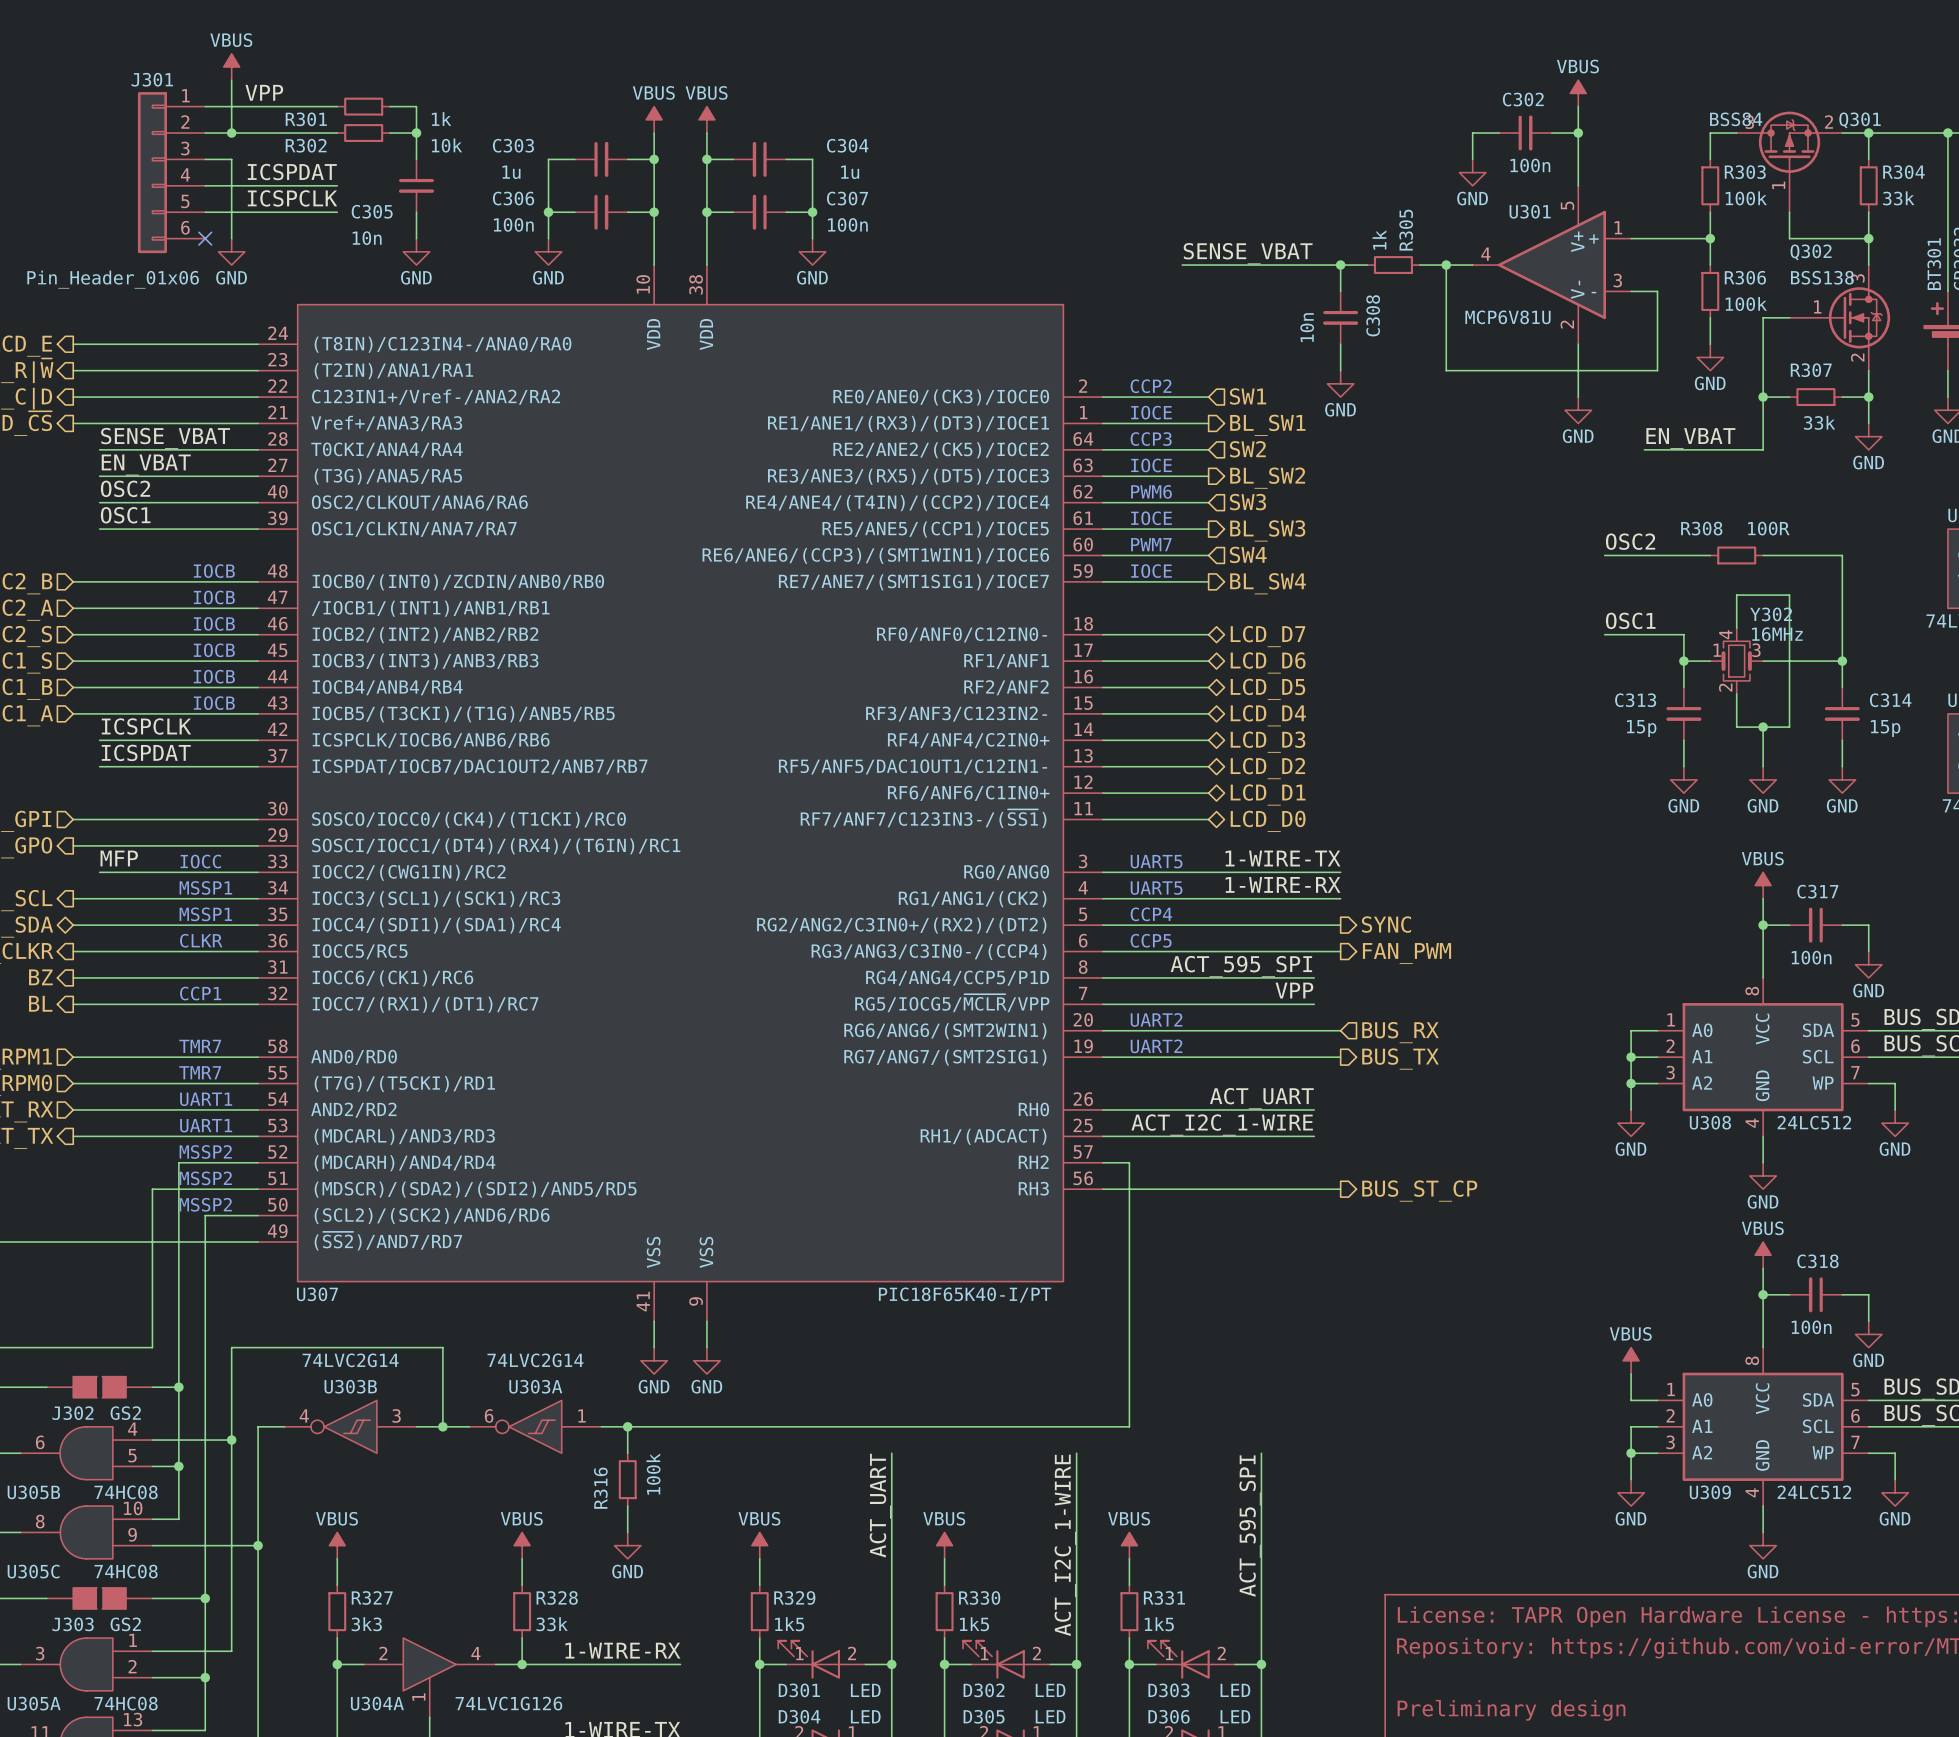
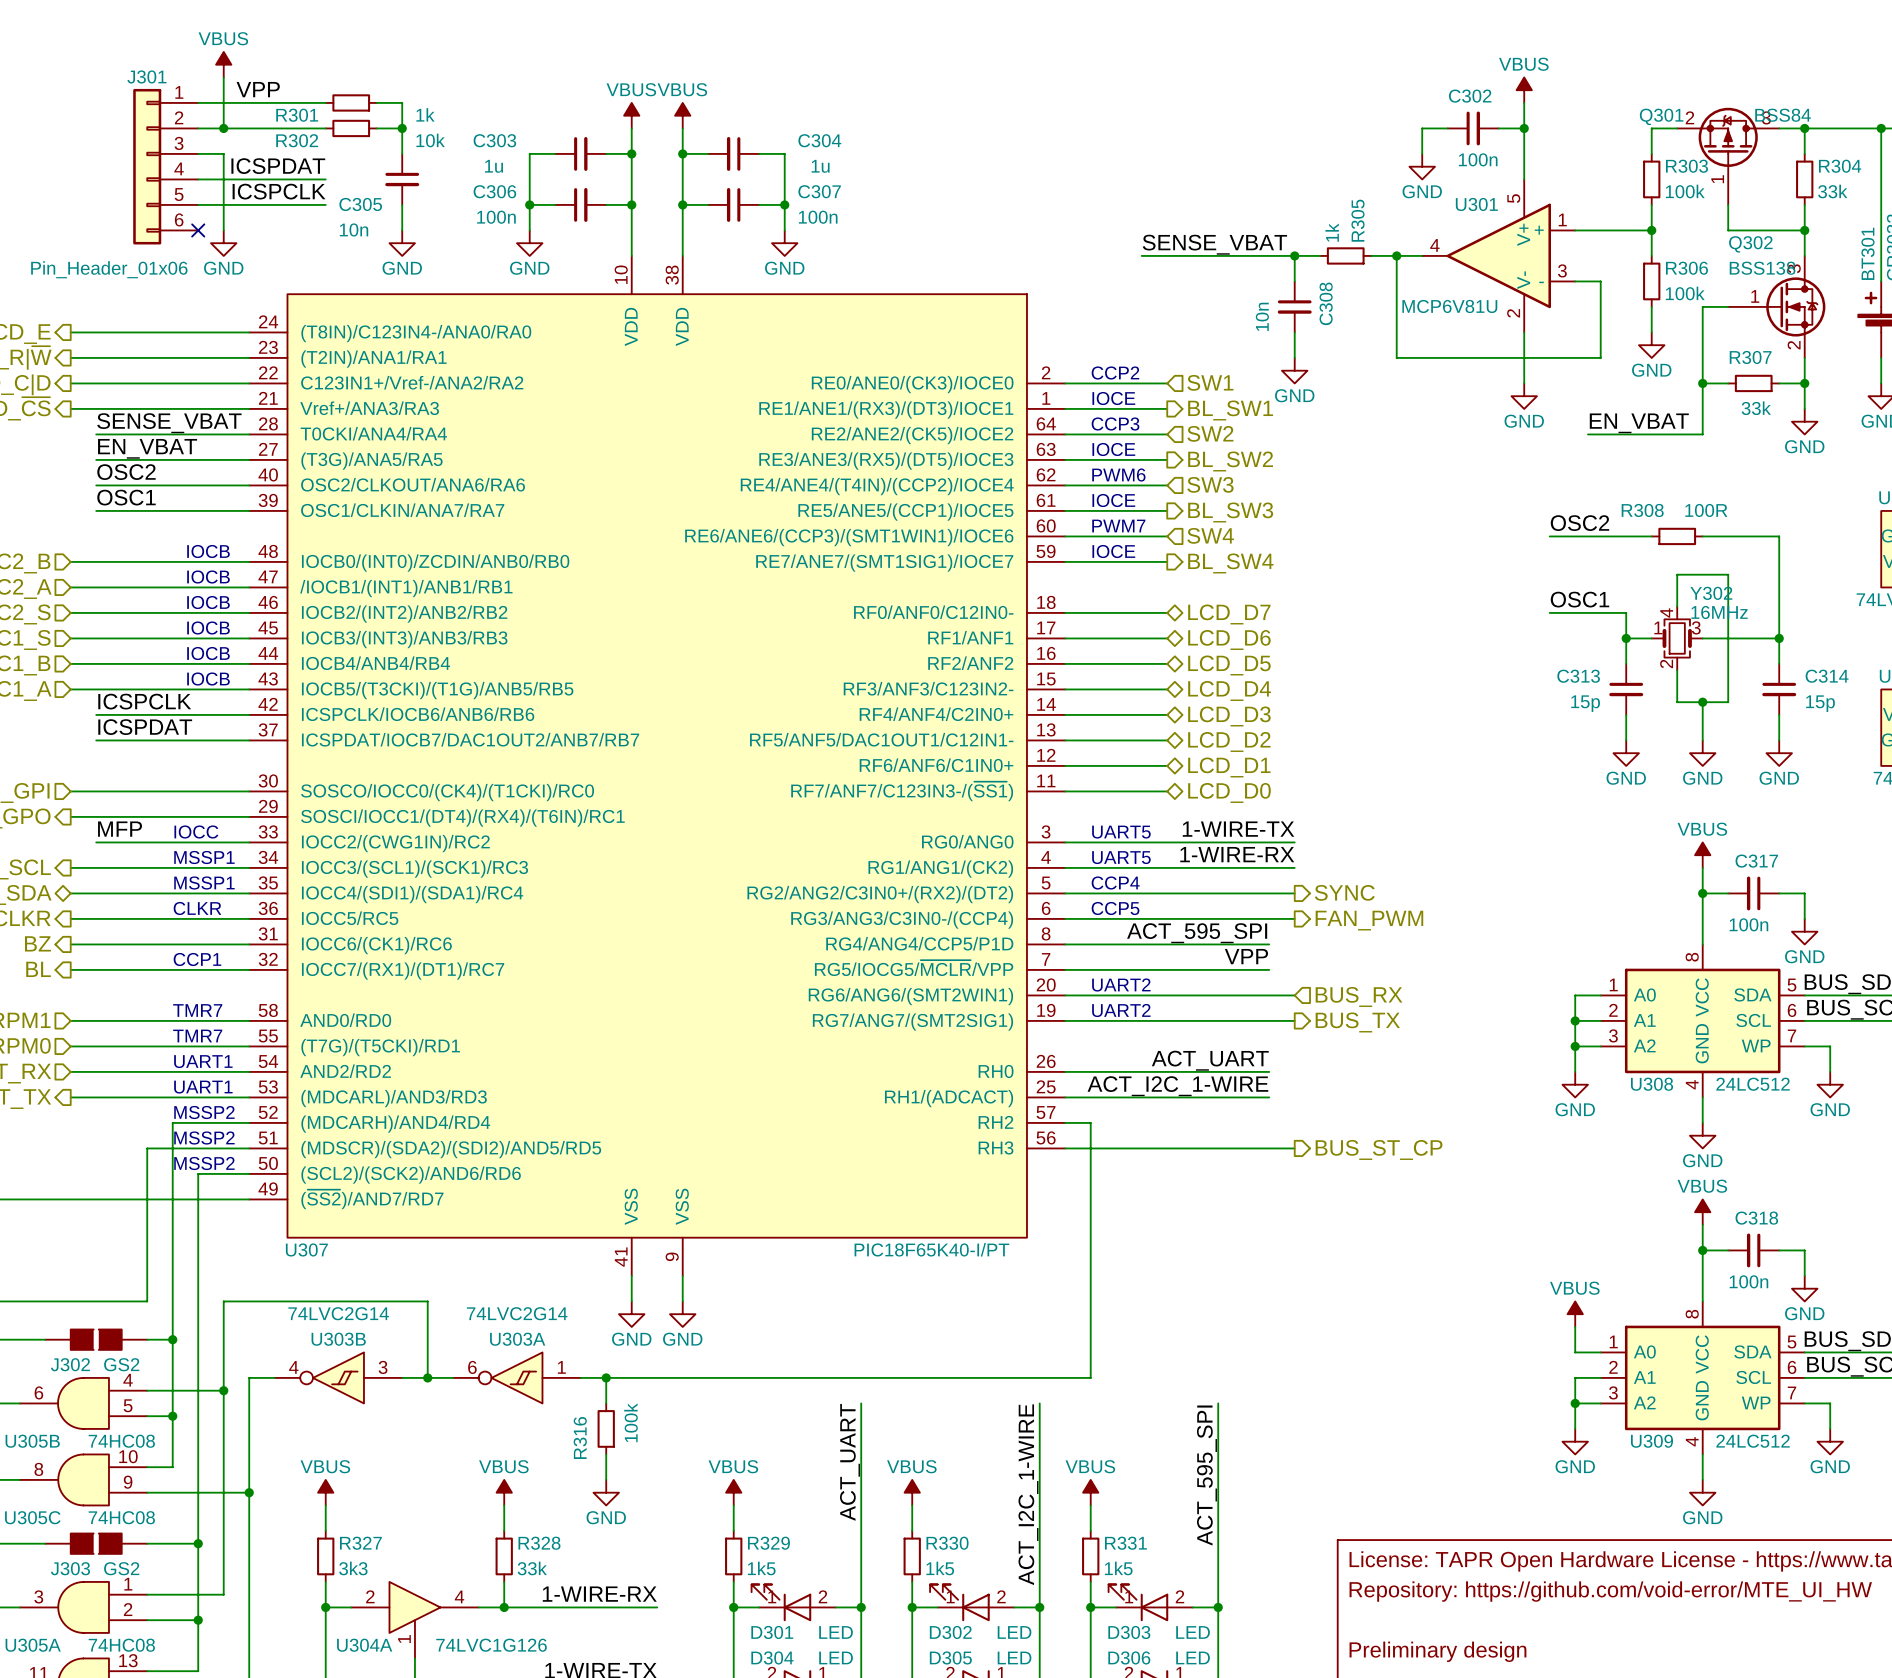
Q301 flip: as is (1789, 142) -> left-right (1728, 137)

